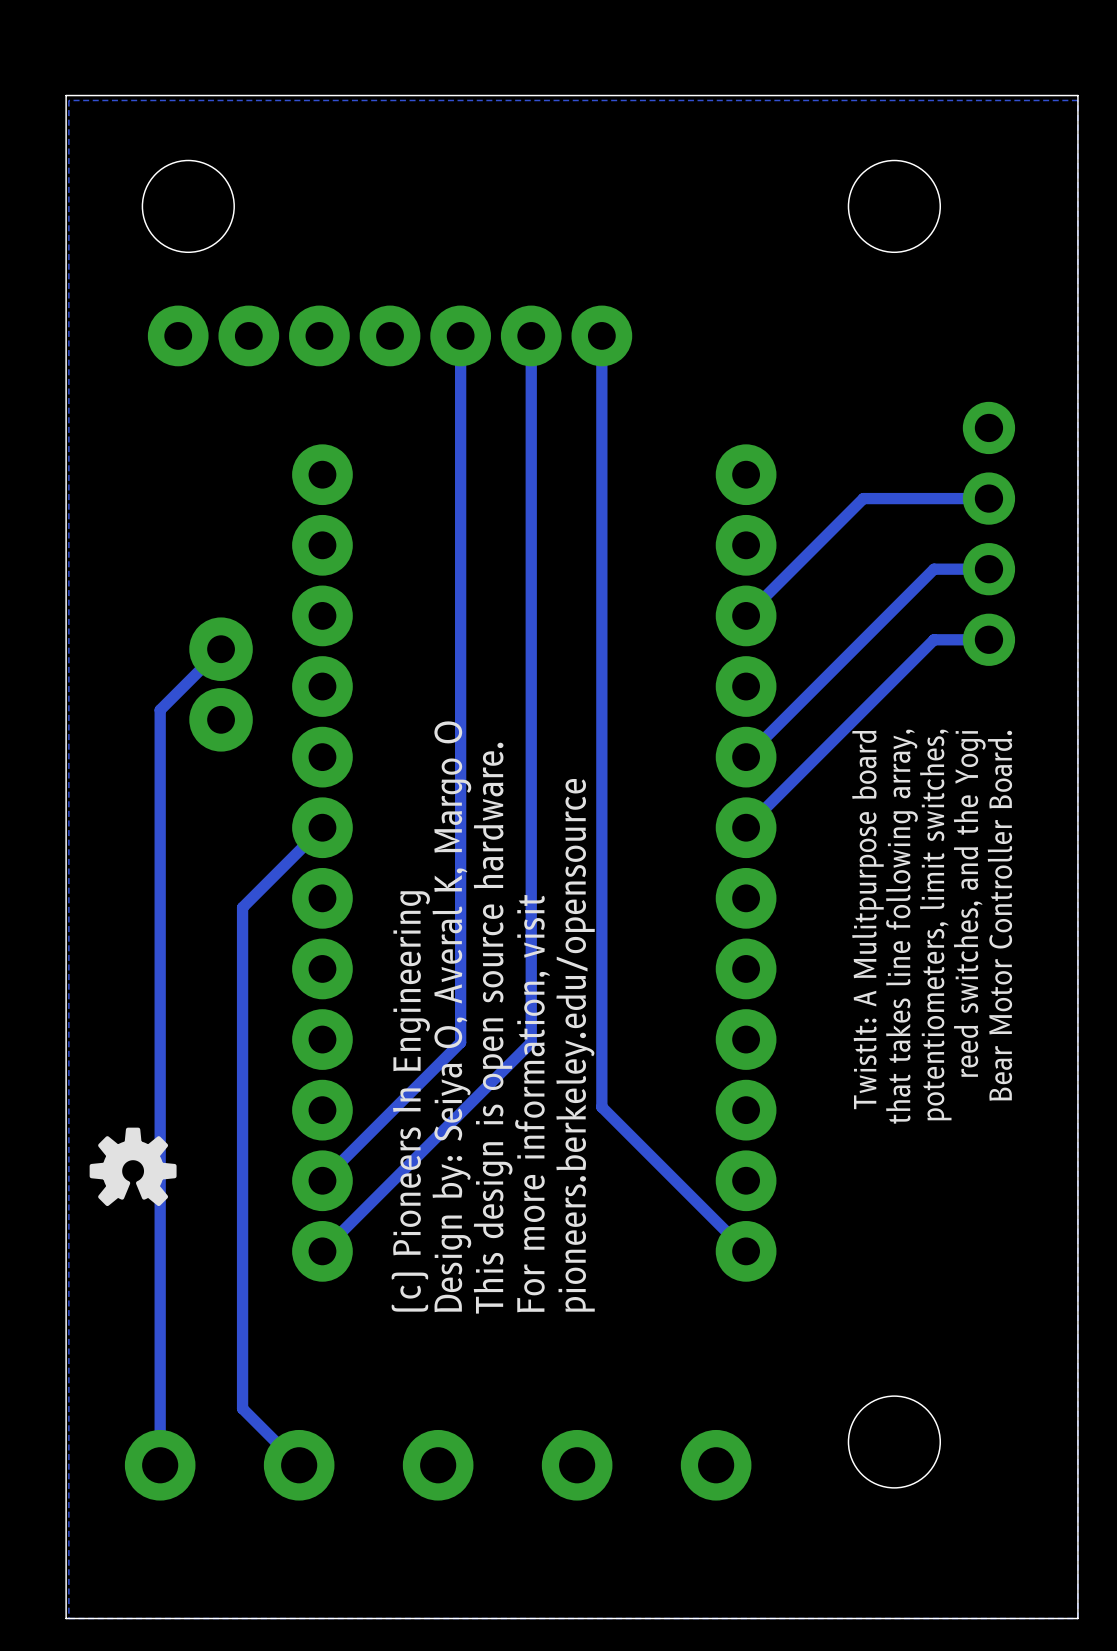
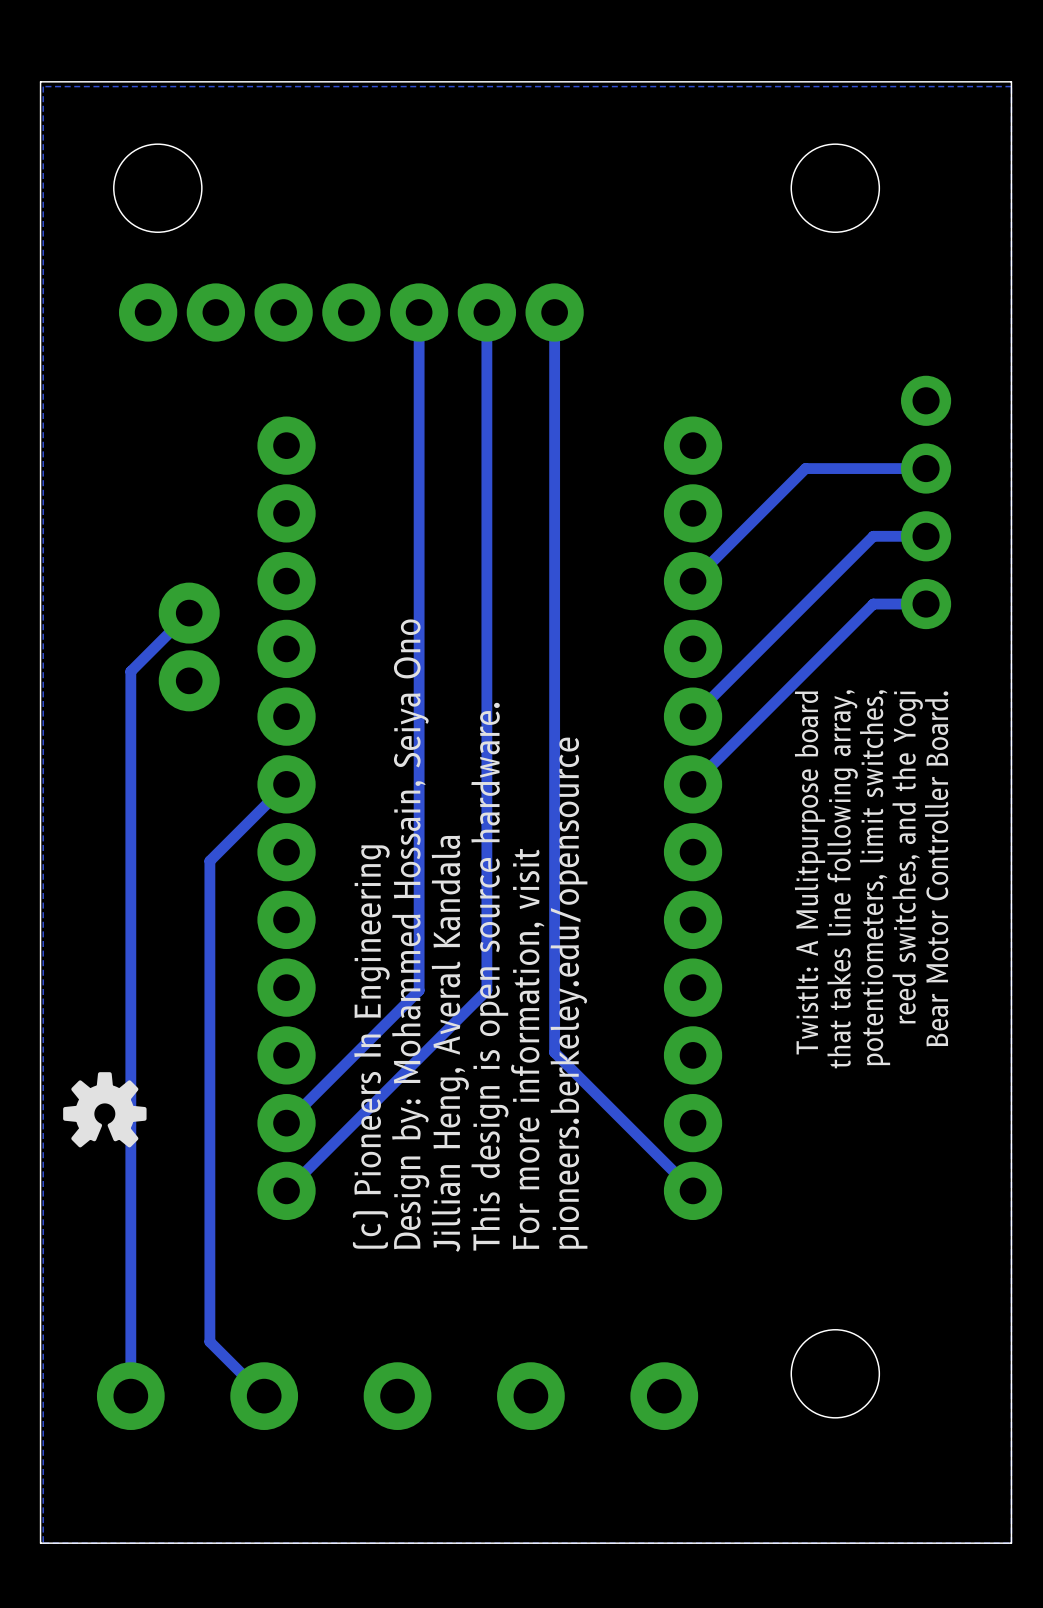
text: Design by: Seiya O, Averal K, Margo O (451, 1016) -> Design by: Mohammed Hossain, Seiya Ono (410, 934)
text: This design is open source hardware. (493, 1028) -> Jillian Heng, Averal Kandala (450, 1043)
text: pioneers.berkeley.edu/opensource (575, 1045) -> For more information, visit (527, 1049)
text: none -> pioneers.berkeley.edu/opensource (569, 993)
text: For more information, visit (532, 1103) -> This design is open source hardware. (489, 976)

